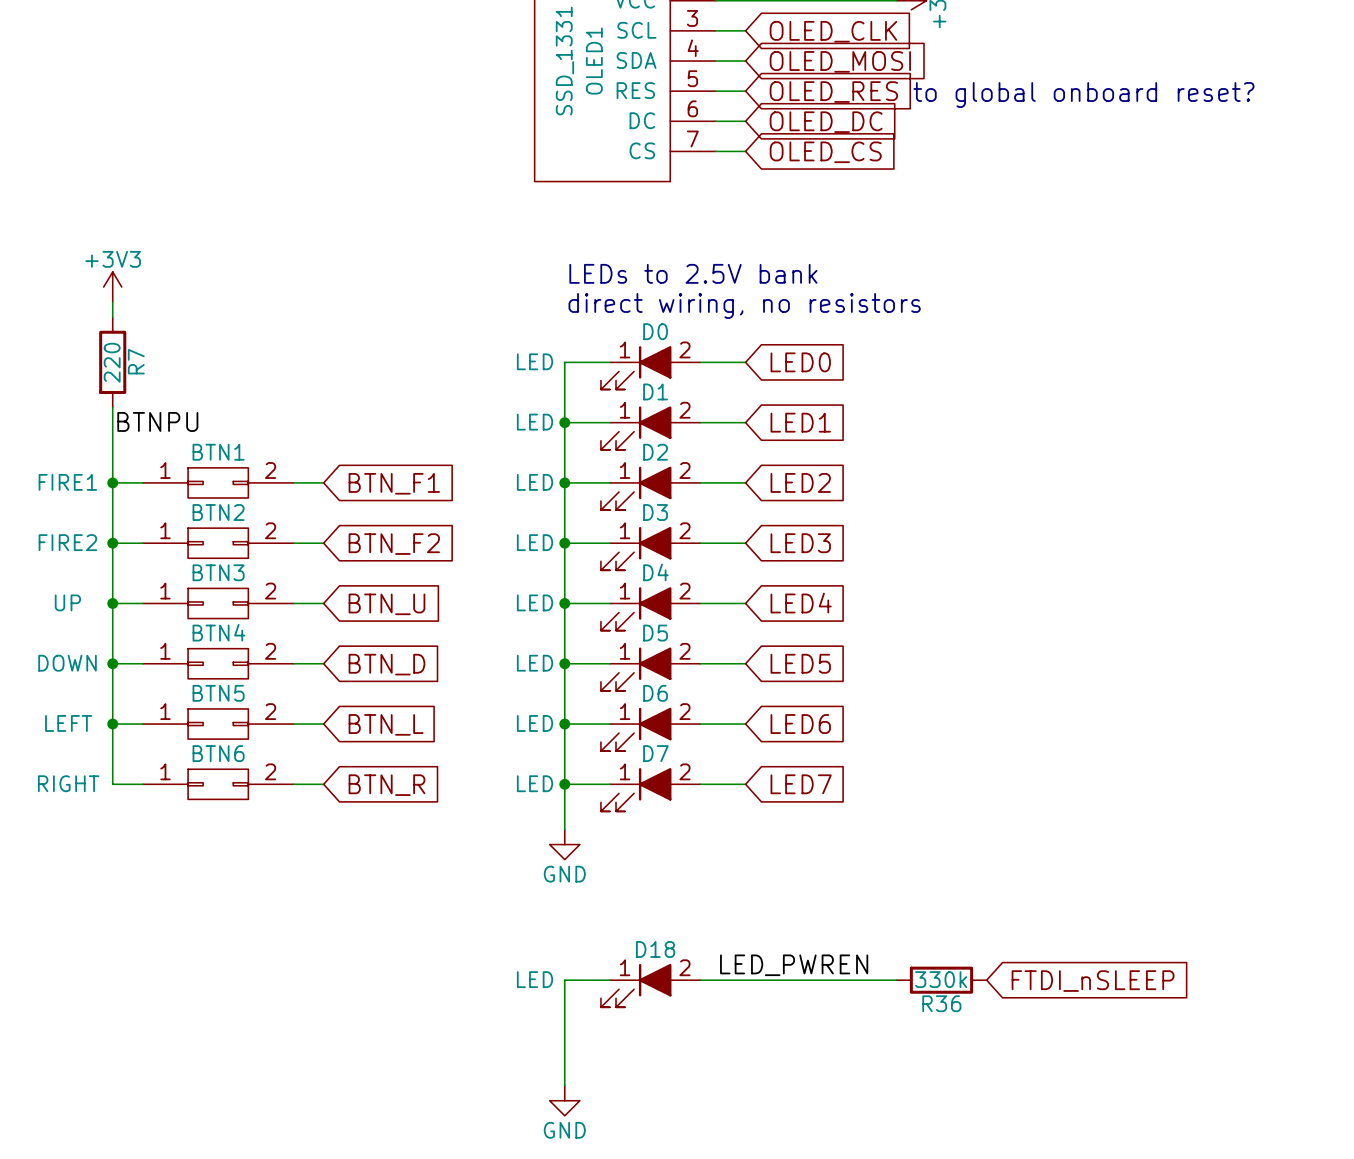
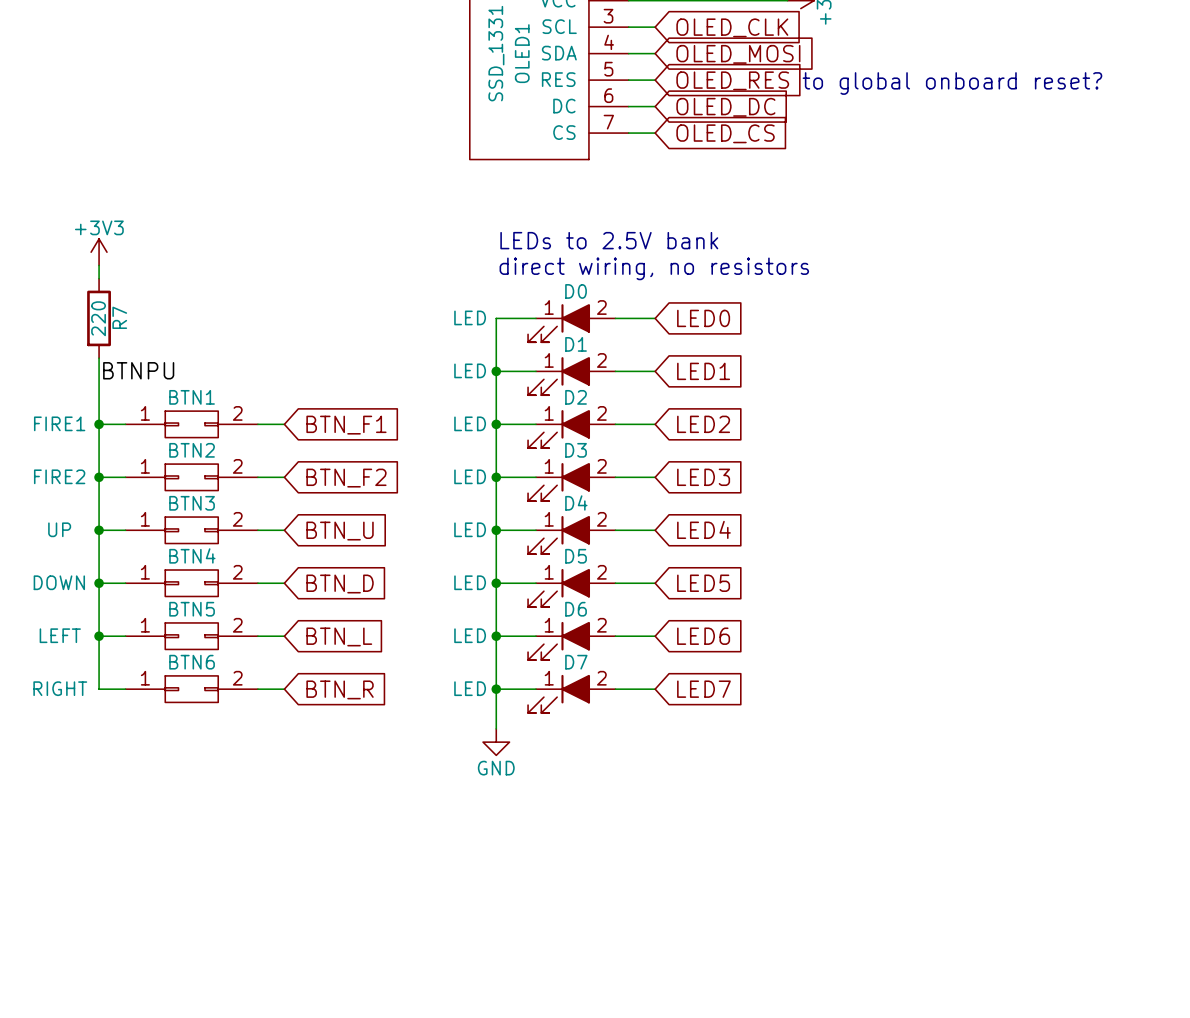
label: LED_PWREN (794, 965) -> none
wire: (609, 980) (564, 980) (564, 1085) -> none
wire: (700, 980) (896, 980) -> none
R36: 330k (941, 980) -> none
global label: FTDI_nSLEEP (1093, 981) -> none
D18: LED (650, 985) -> none
power symbol: GND (564, 1100) -> none

